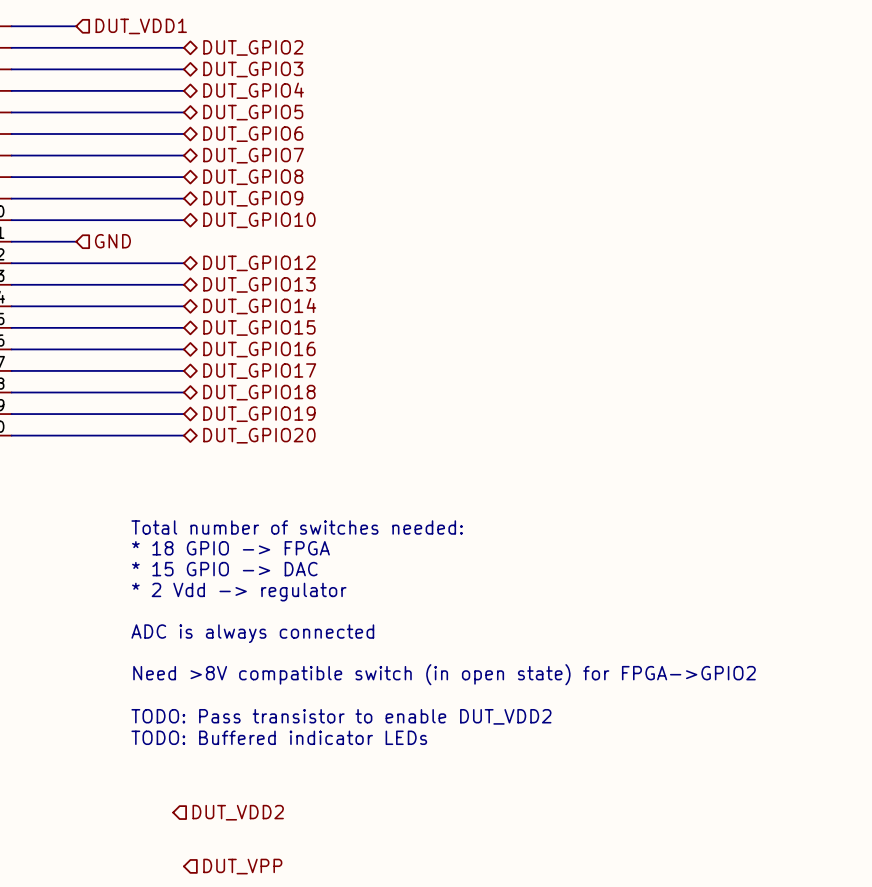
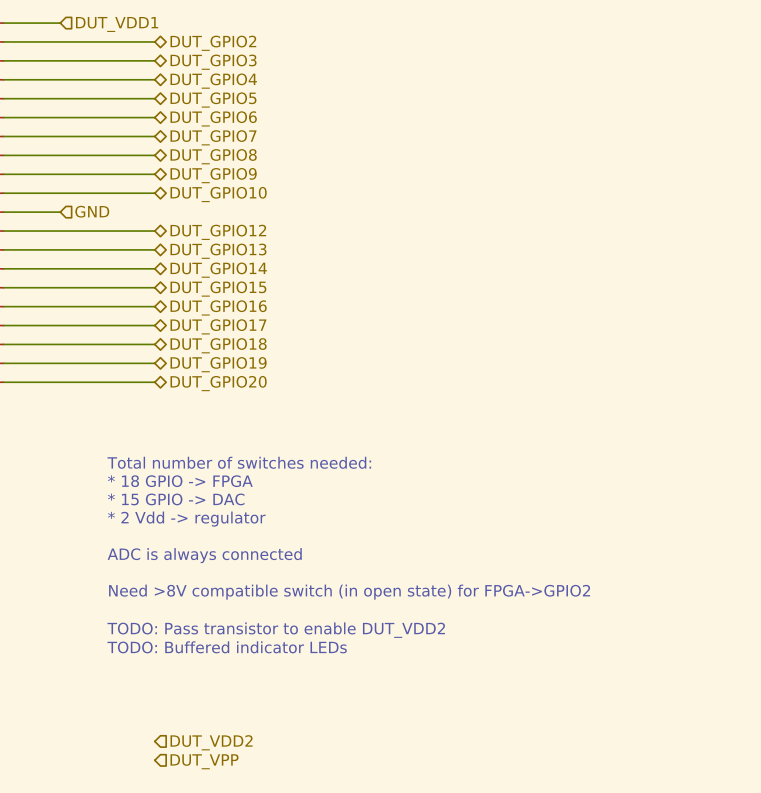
hierarchical label position: DUT_VDD2 (238, 812) -> DUT_VDD2 (211, 742)

